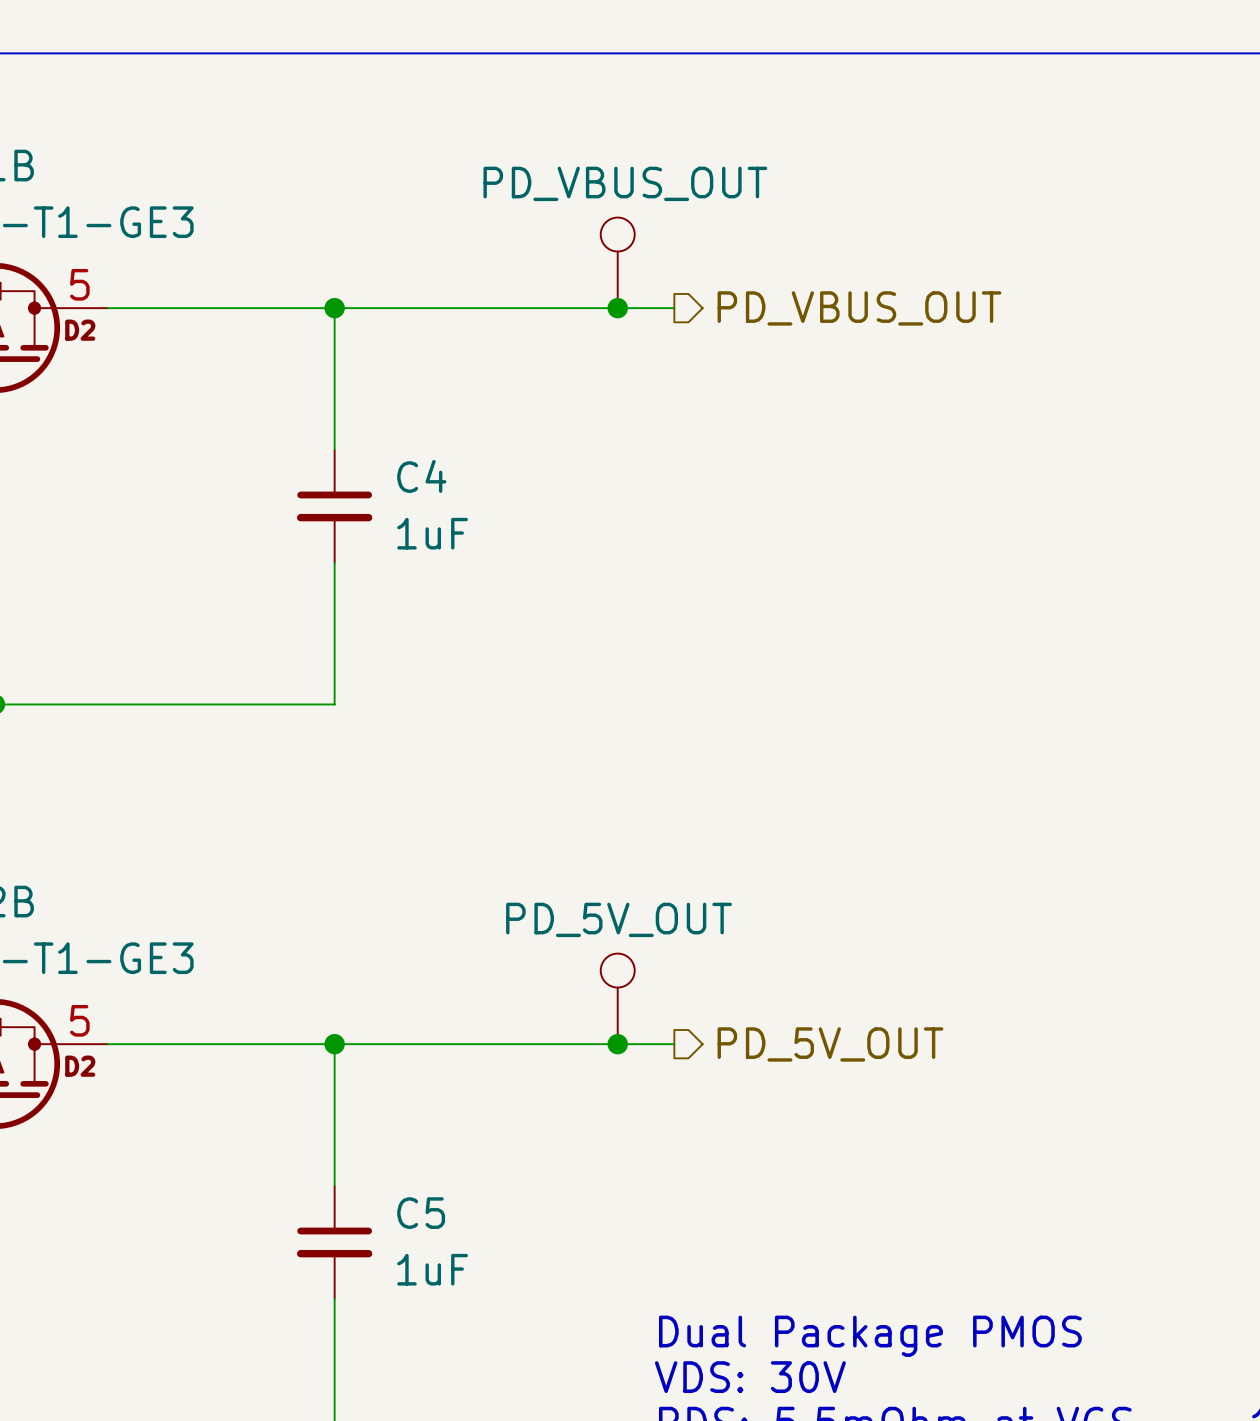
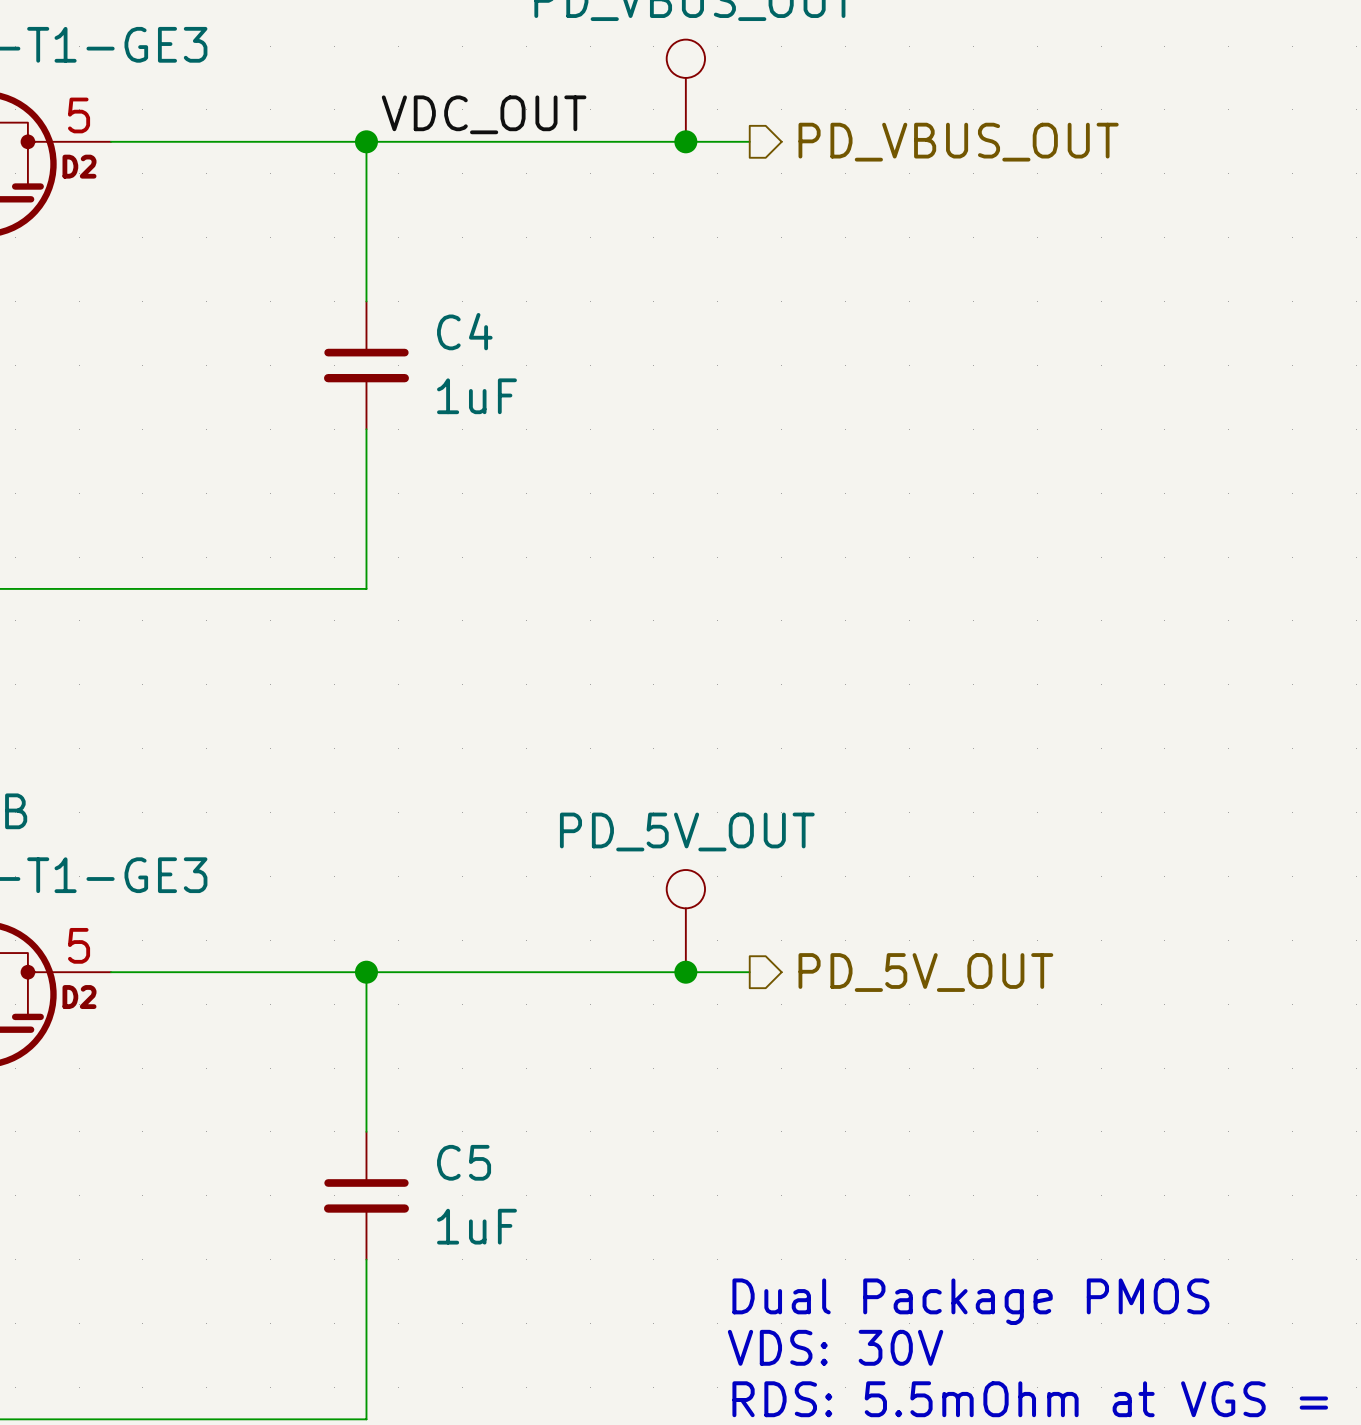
label: none -> VDC_OUT (484, 114)

